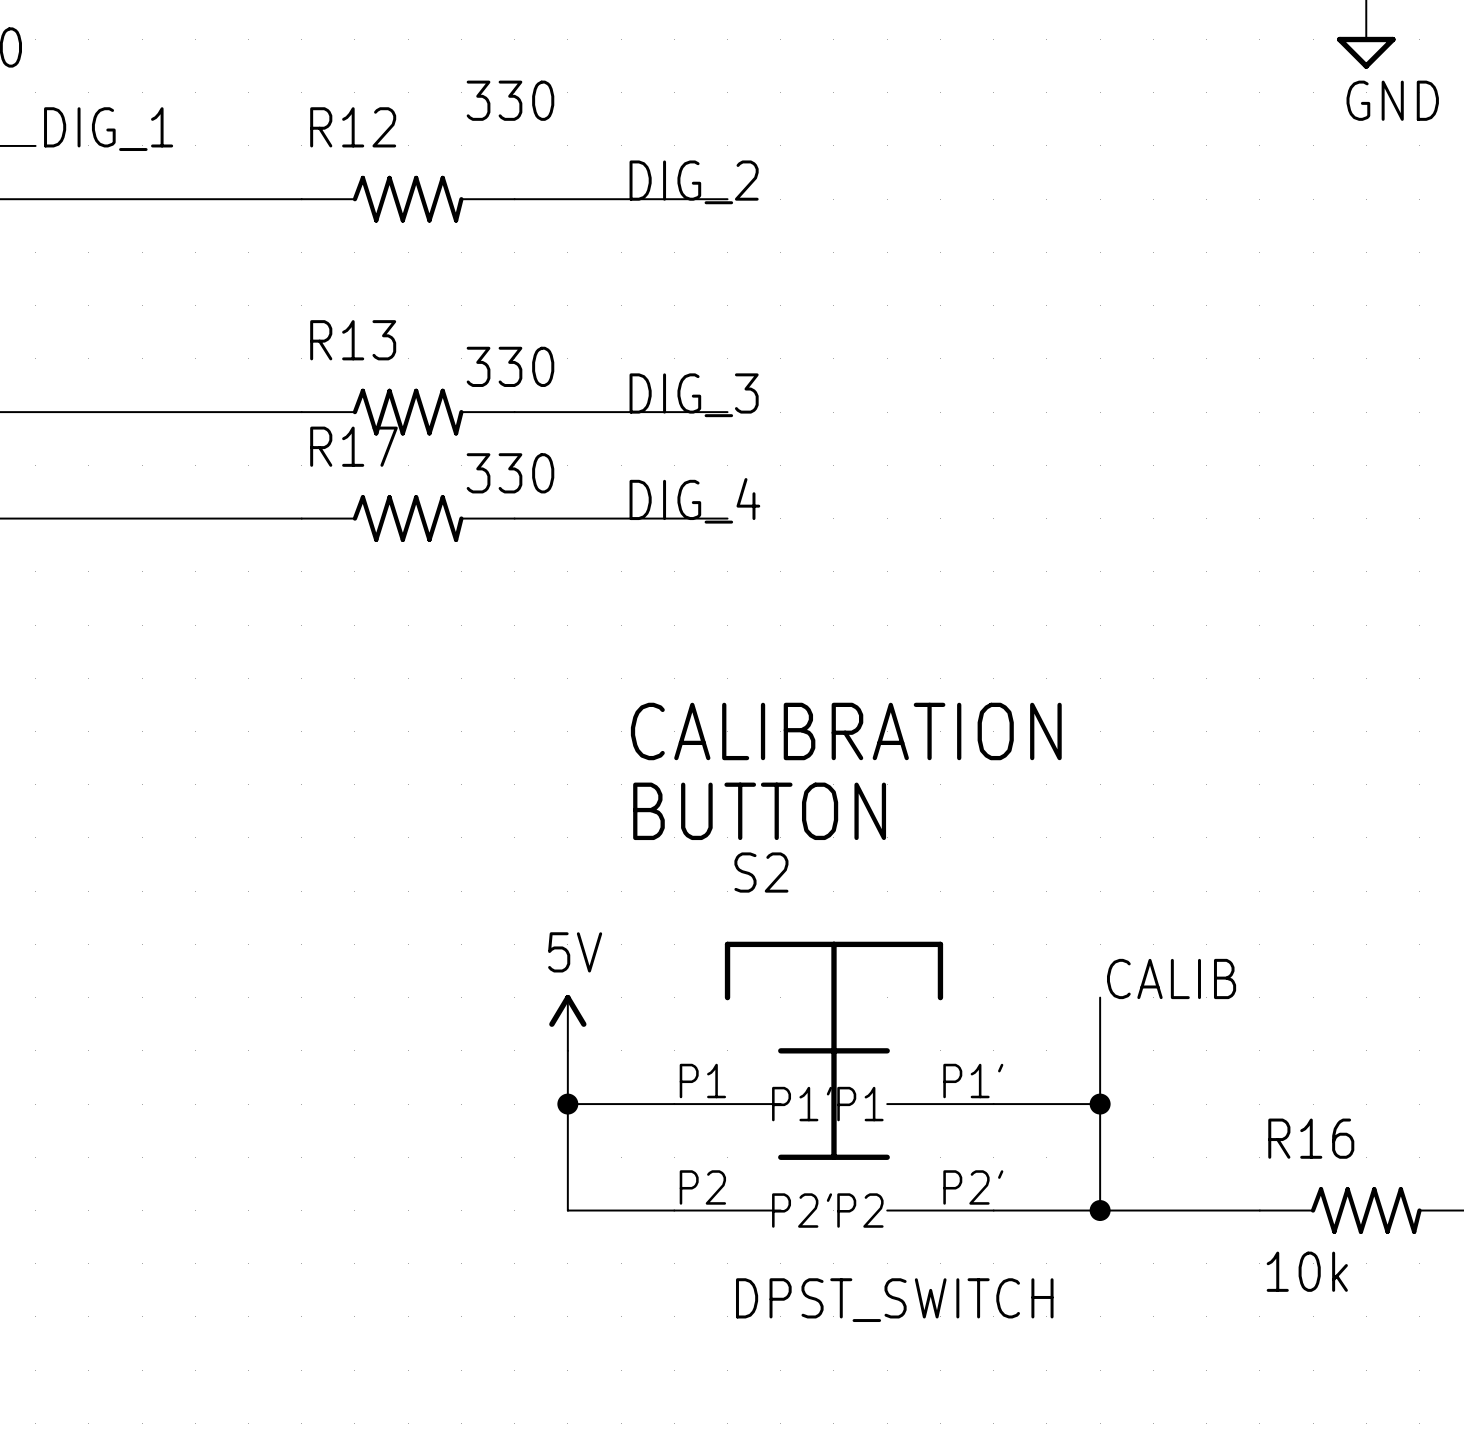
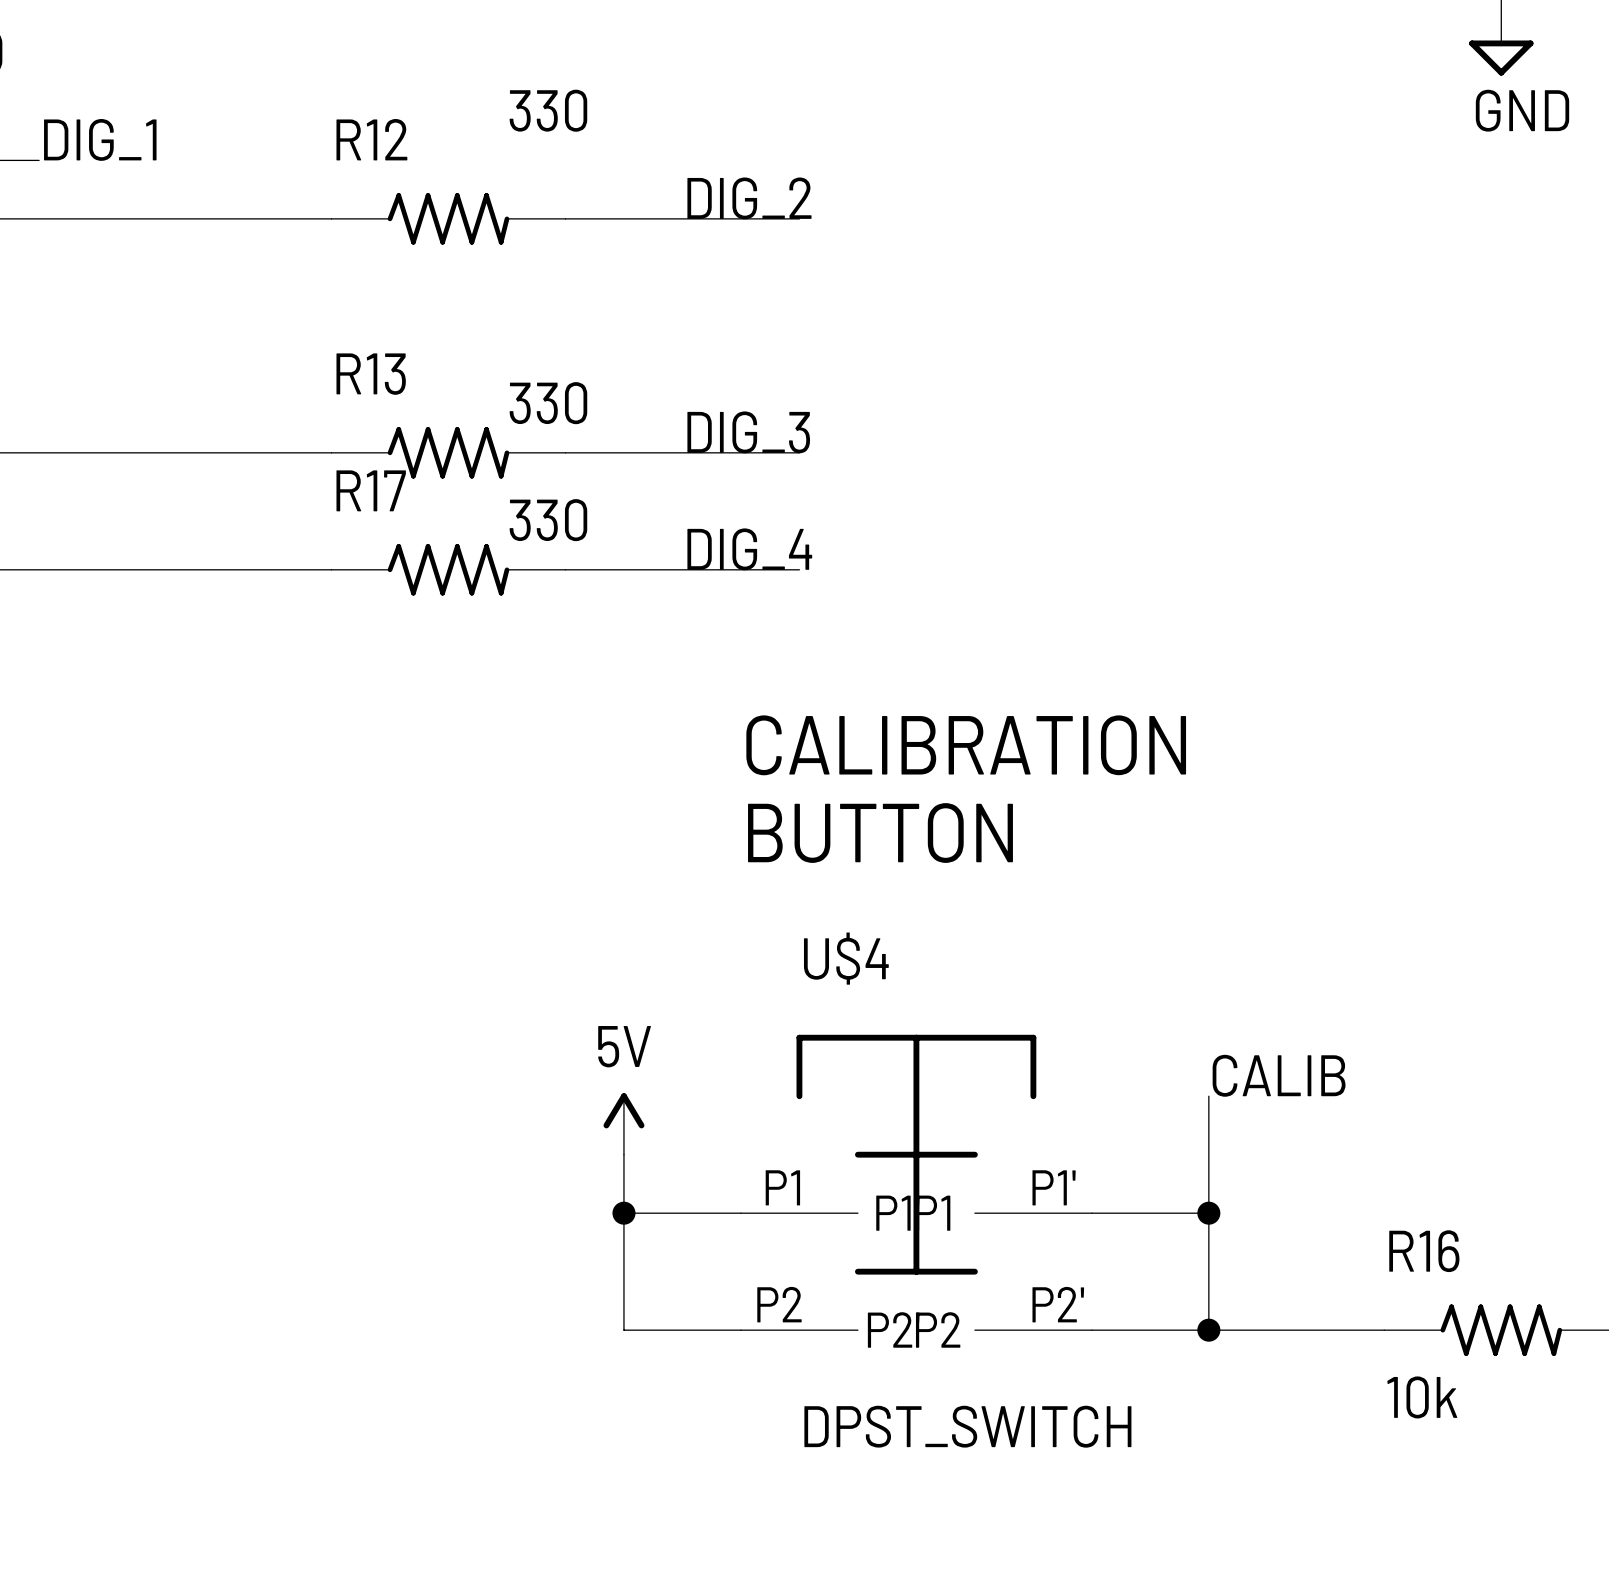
text position: CALIBRATION (846, 731) -> CALIBRATION (966, 745)
text position: BUTTON (759, 811) -> BUTTON (880, 833)
S2 name: S2 (761, 872) -> U$4 (846, 958)

